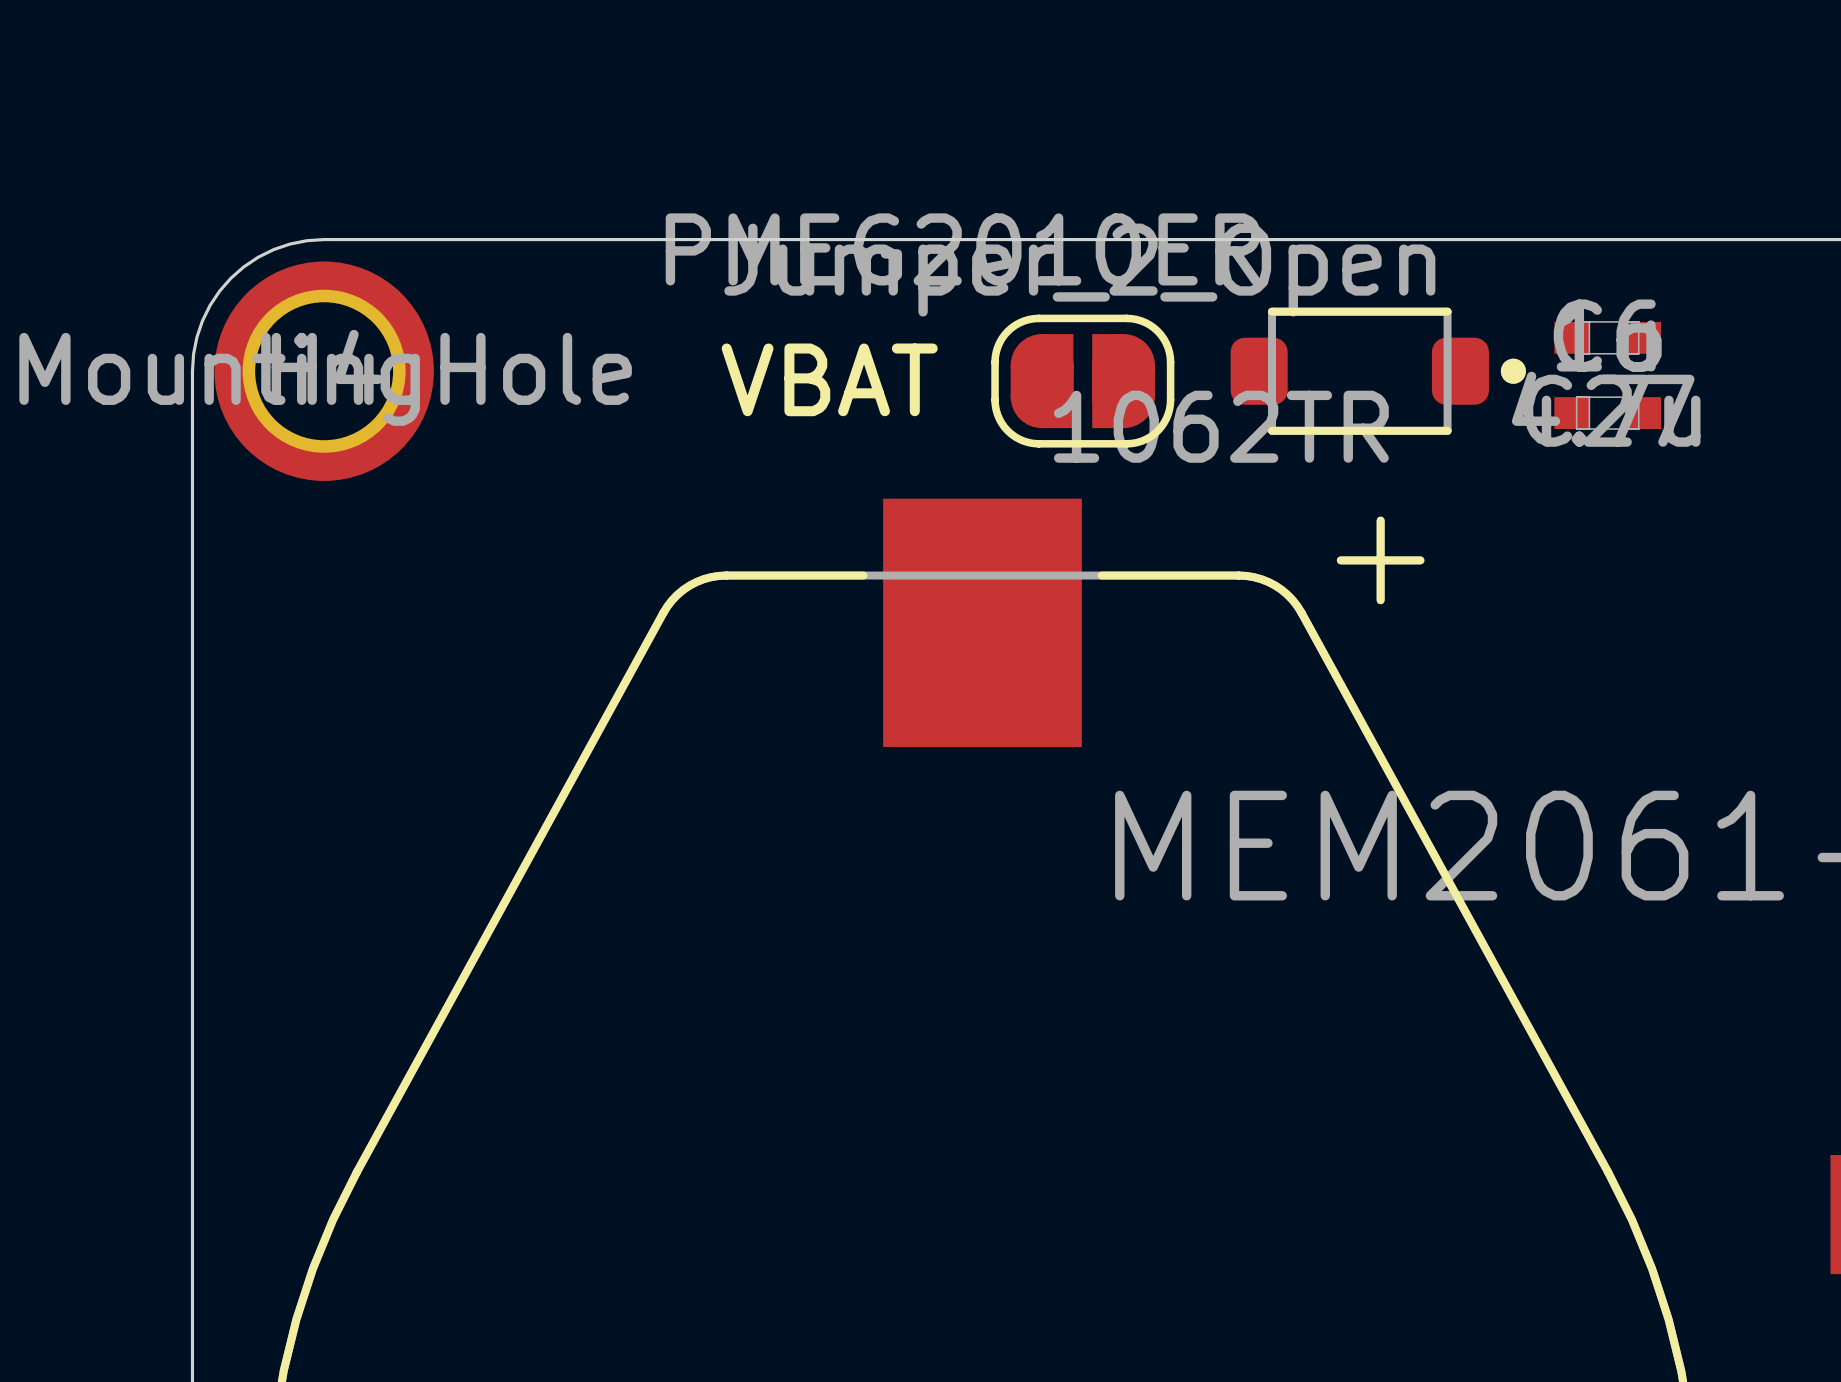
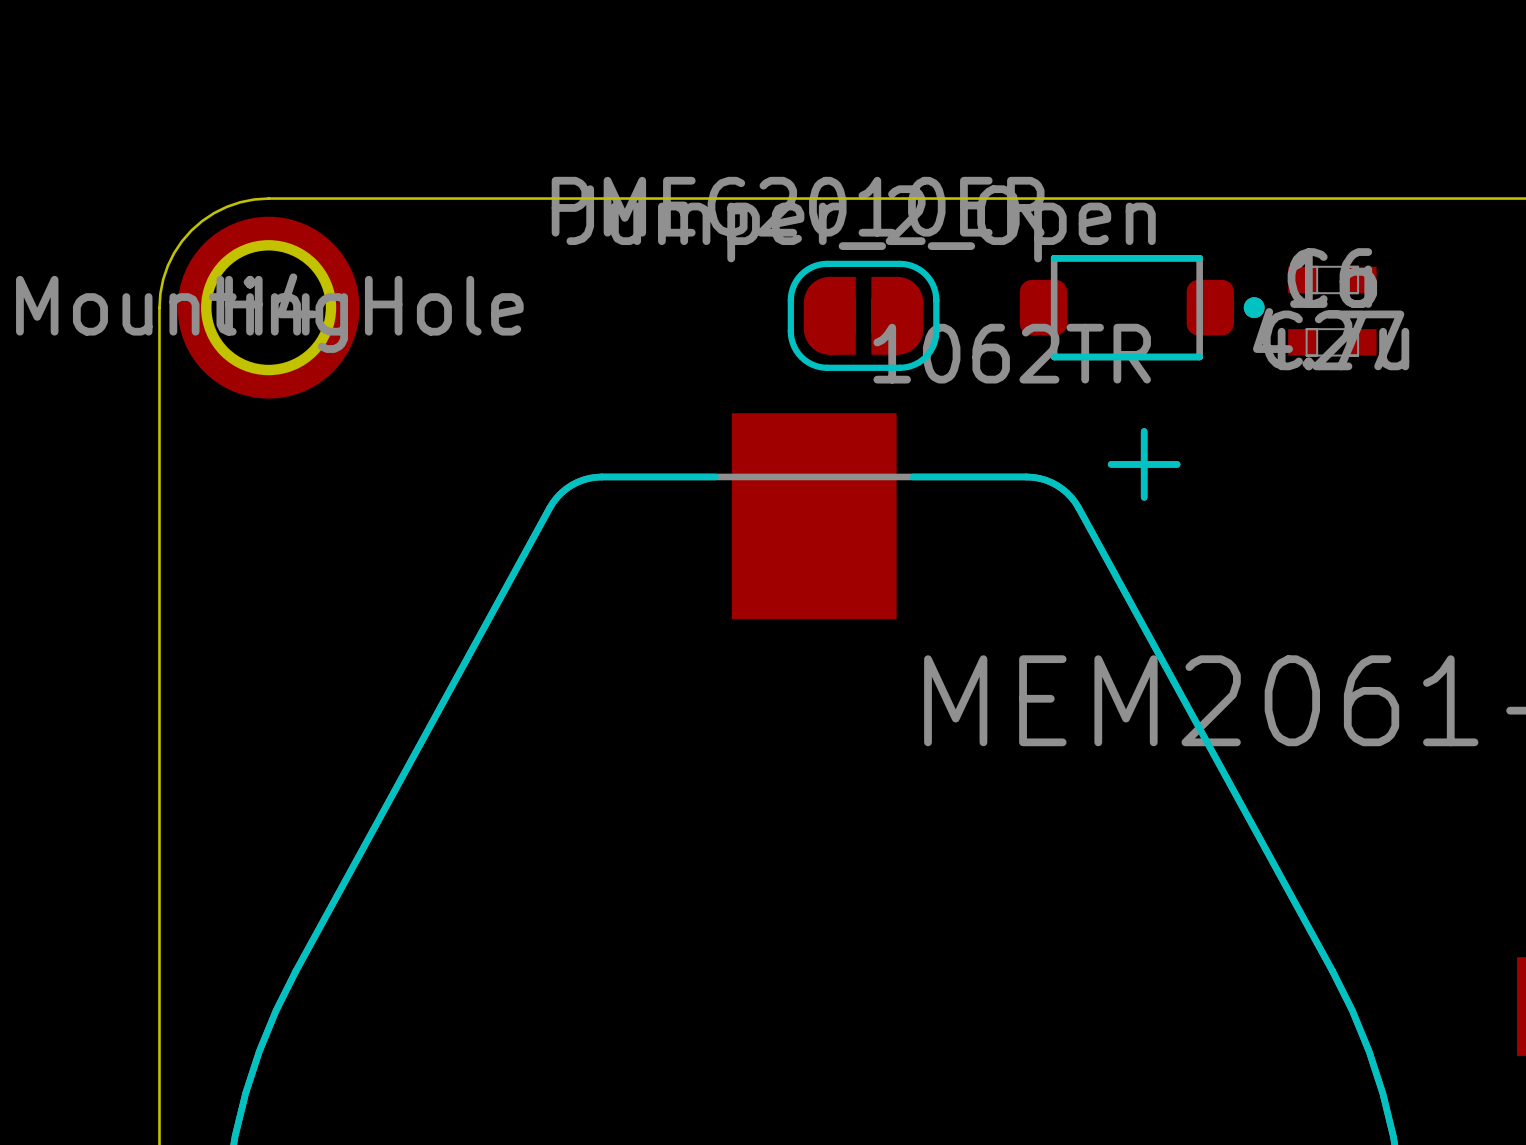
text: VBAT (829, 379) -> none
part position: (1082, 381) -> (863, 315)

